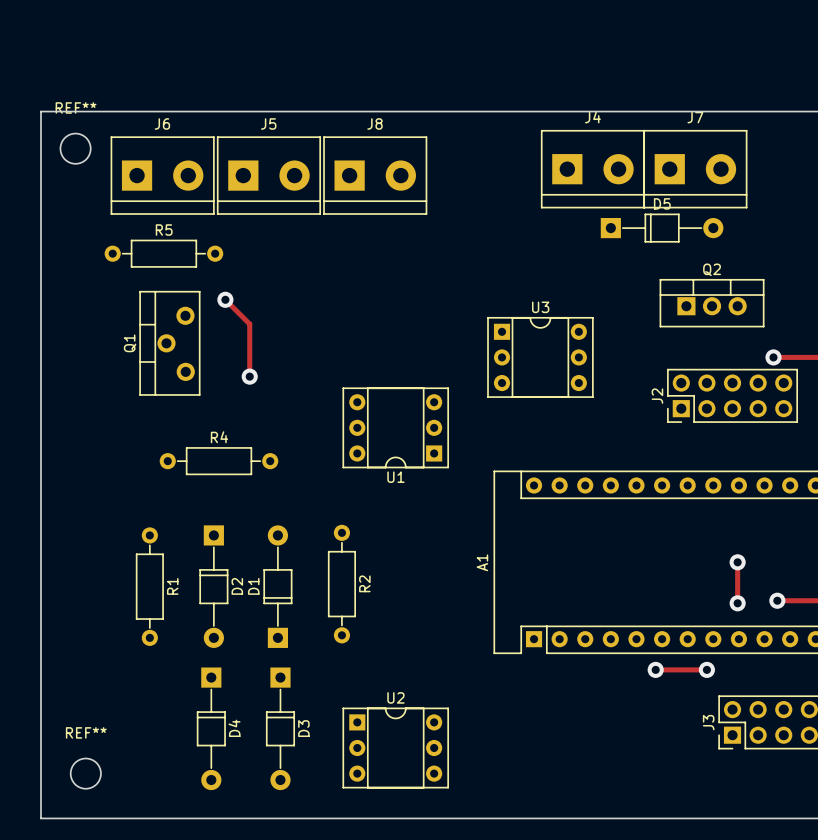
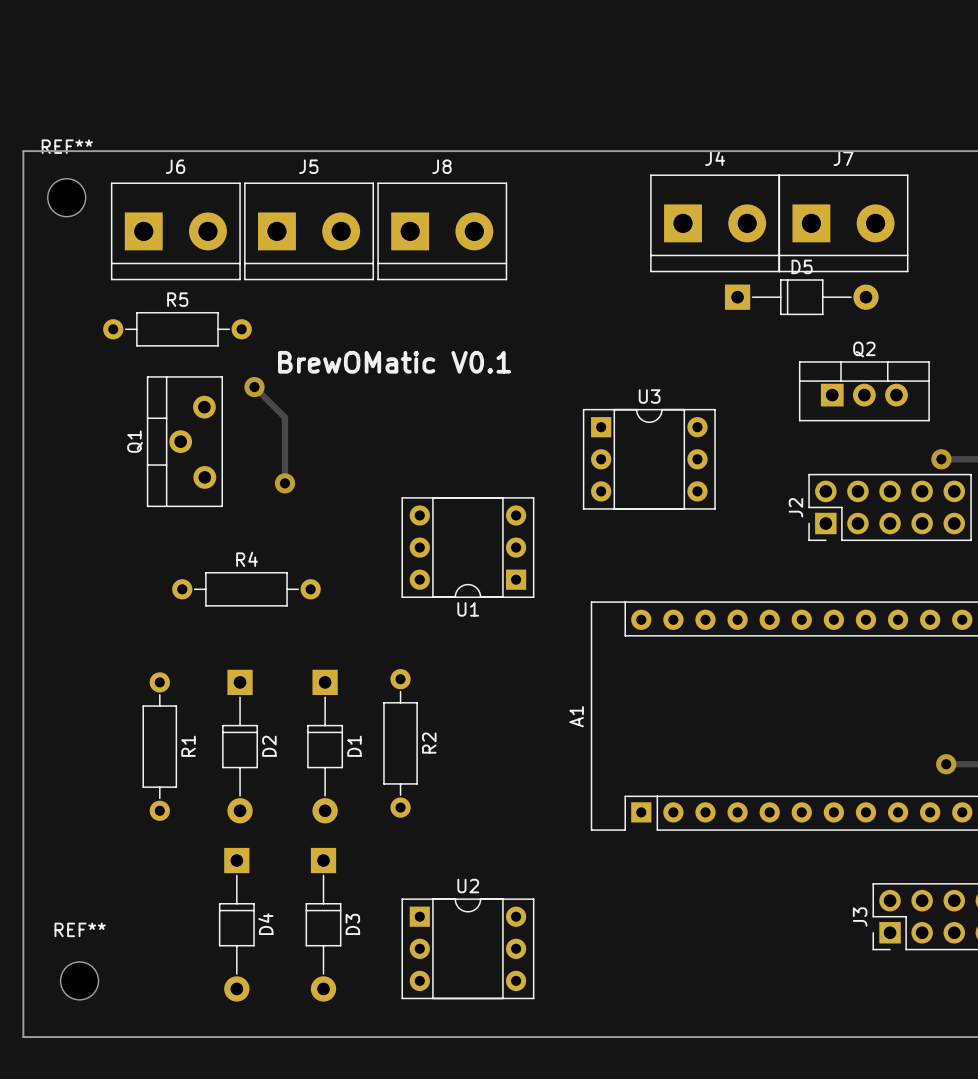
text: none -> BrewOMatic V0.1 (394, 362)
track: (737, 562) (737, 603) -> none
via: (737, 562) -> none
D1 rotation: 0° (277, 586) -> 180° (325, 746)
via: (737, 603) -> none
track: (655, 669) (706, 669) -> none
via: (655, 669) -> none
via: (706, 669) -> none

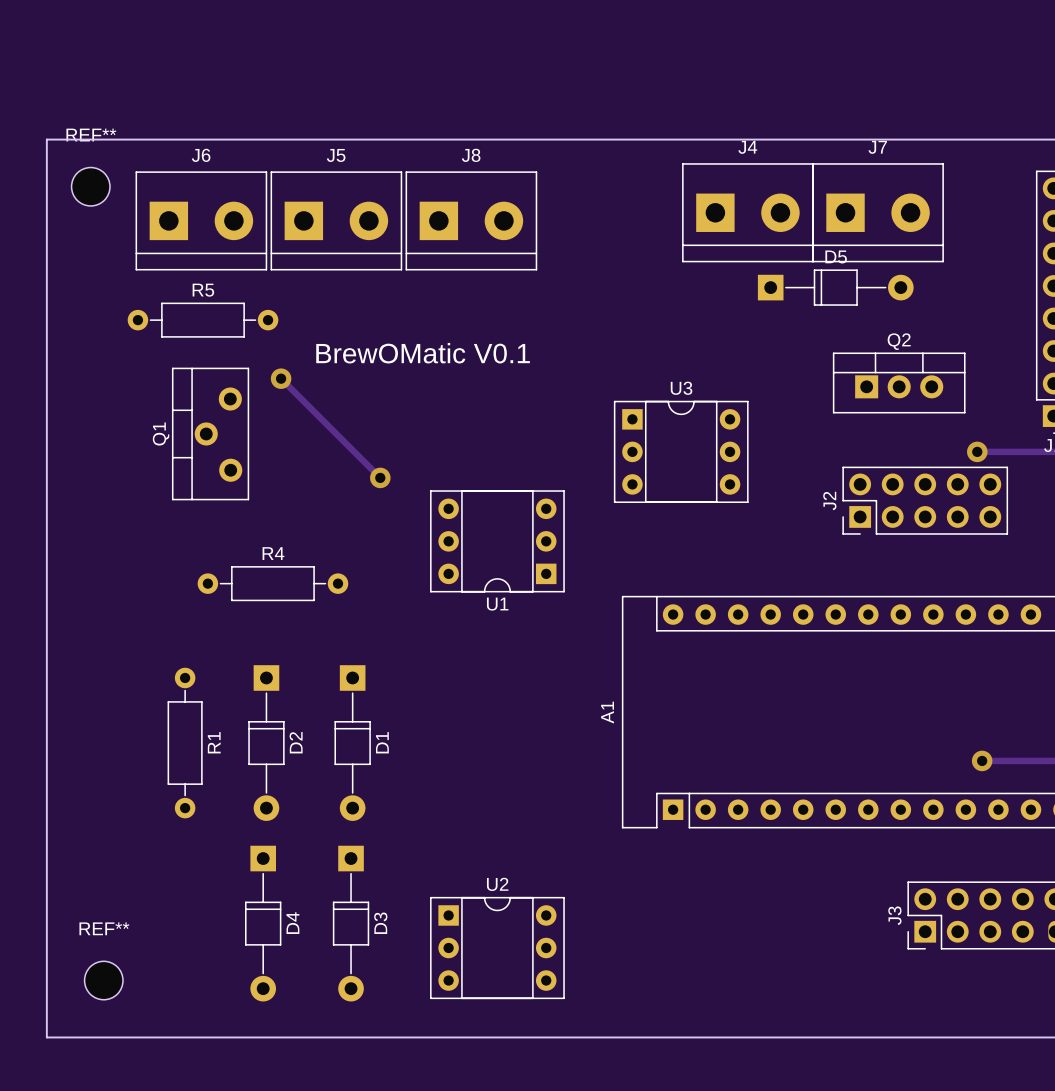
track: (284, 417) (284, 483) -> (311, 409) (380, 477)
via position: (284, 483) -> (380, 477)
R2: (400, 743) -> none

